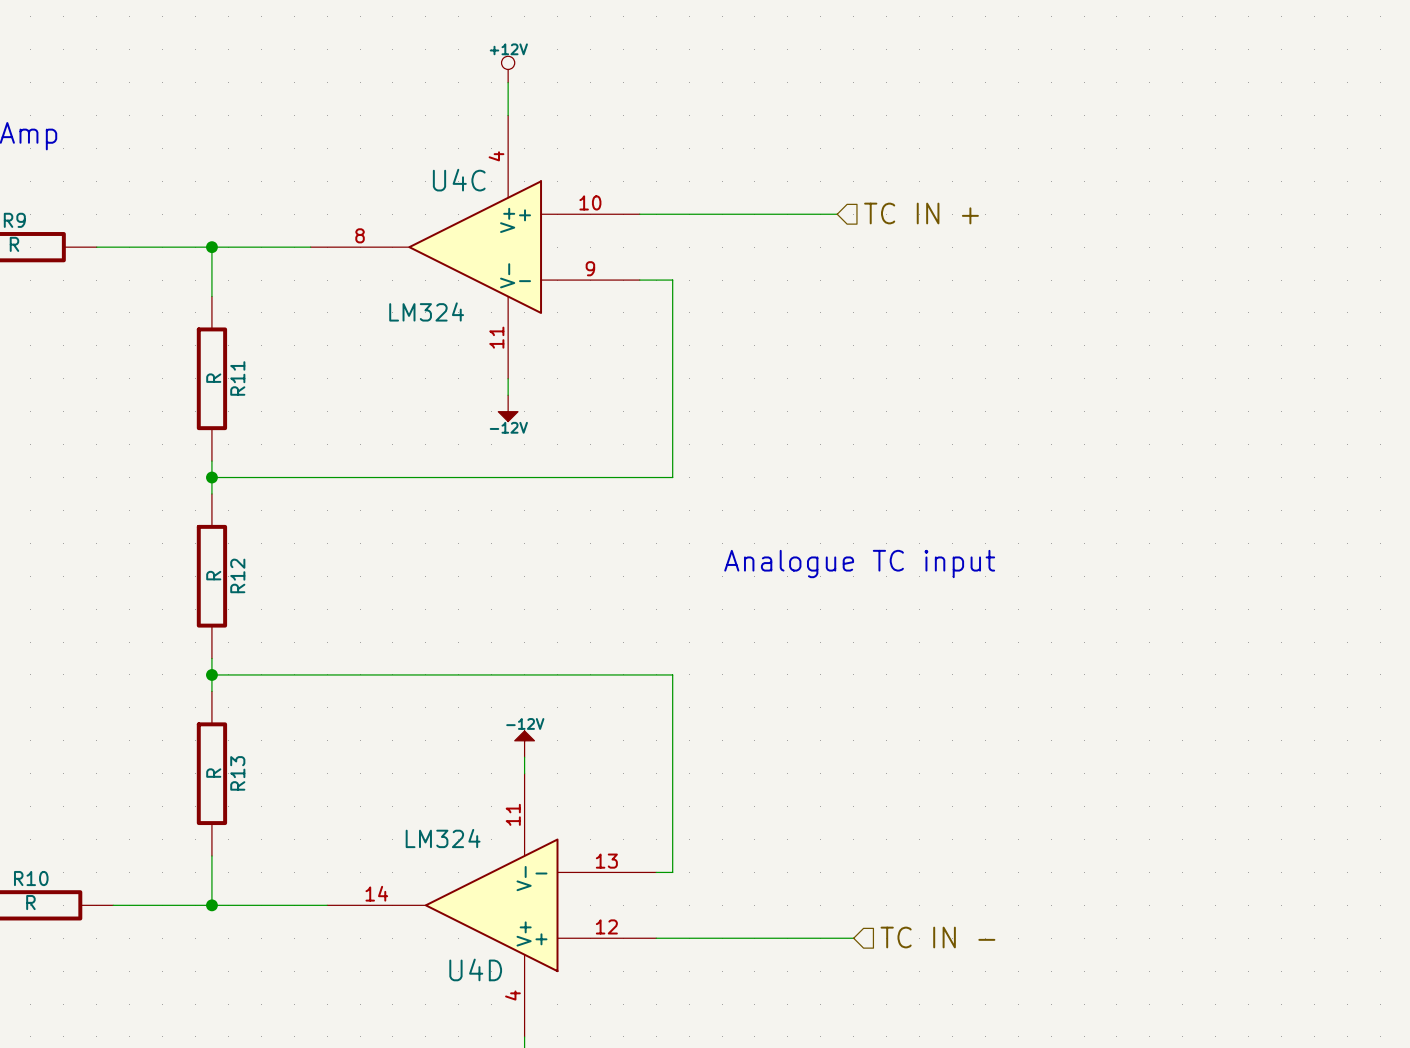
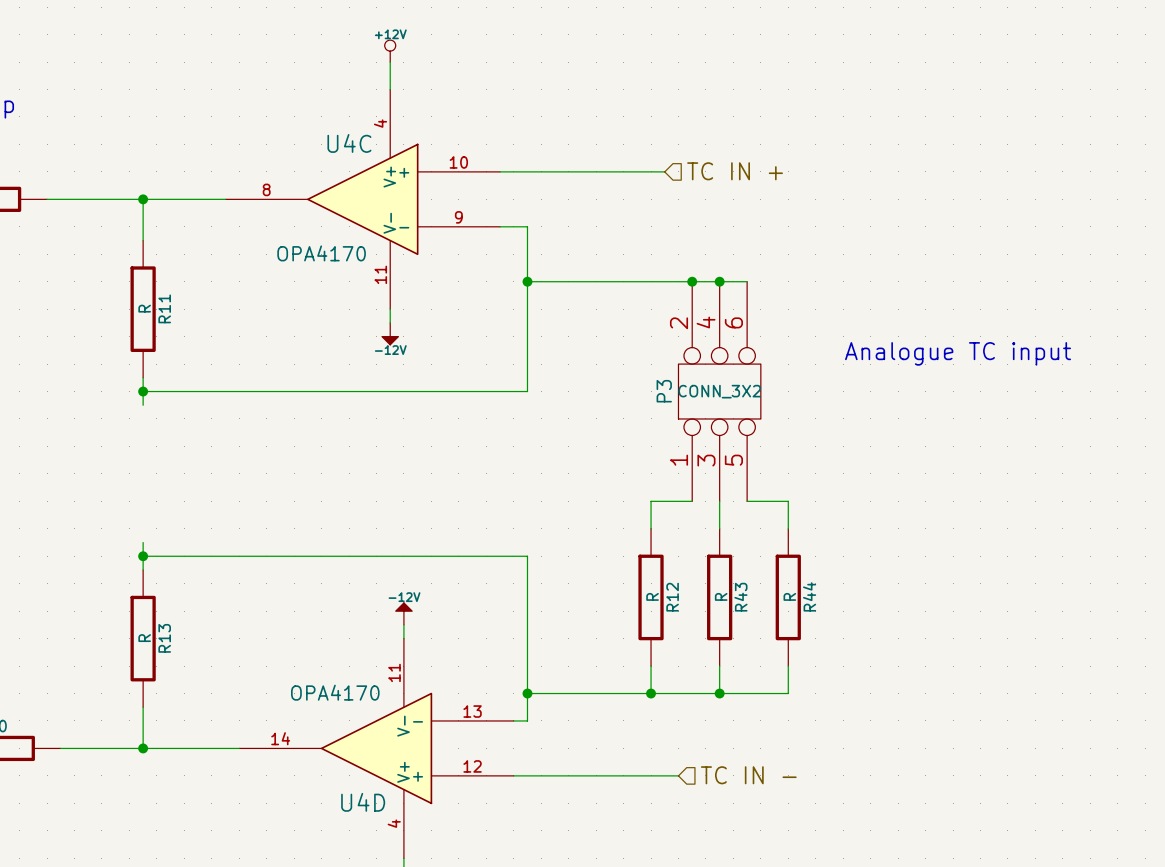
U4C value: LM324 (426, 311) -> OPA4170 (321, 253)
wire: none -> (527, 281) (747, 281)
junction: none -> (527, 281)
junction: none -> (692, 281)
junction: none -> (719, 281)
text: none -> Analogue TC input (958, 353)
P3: none -> CONN_3X2 (719, 391)
text: Analogue TC input (859, 564) -> none
R12 position: (211, 576) -> (651, 597)
wire: none -> (692, 501) (651, 501) (651, 528)
wire: none -> (719, 501) (719, 528)
wire: none -> (747, 501) (788, 501) (788, 528)
R43: none -> R (719, 597)
R44: none -> R (788, 597)
wire: none -> (651, 666) (651, 693)
wire: none -> (719, 666) (719, 693)
wire: none -> (788, 666) (788, 693) (527, 693)
U4D value: LM324 (443, 838) -> OPA4170 (335, 692)
junction: none -> (527, 693)
junction: none -> (651, 693)
junction: none -> (719, 693)

